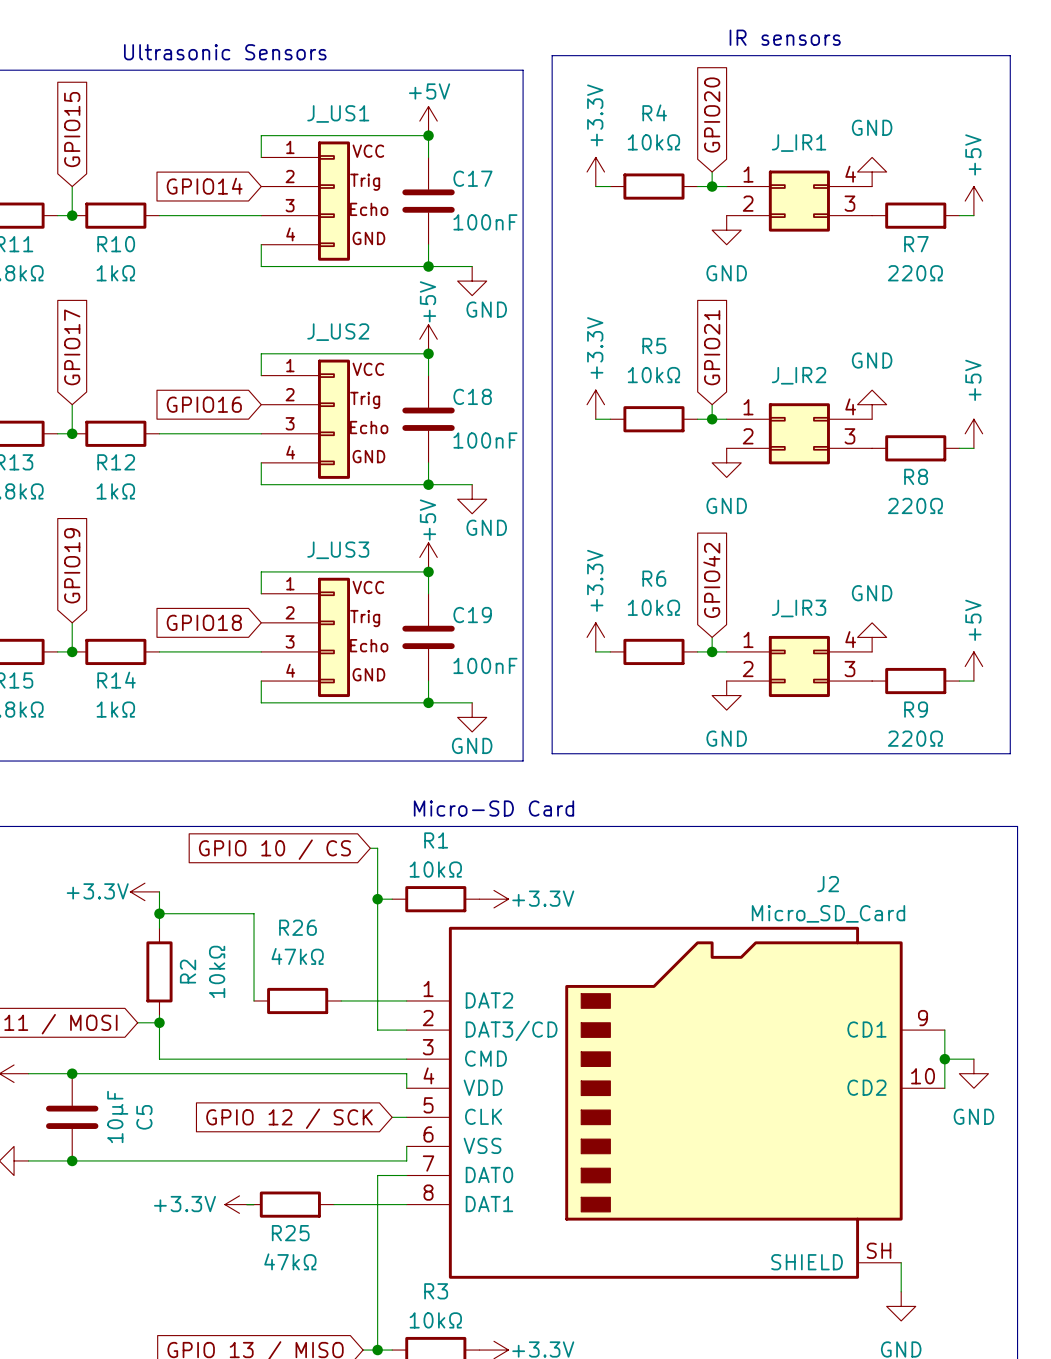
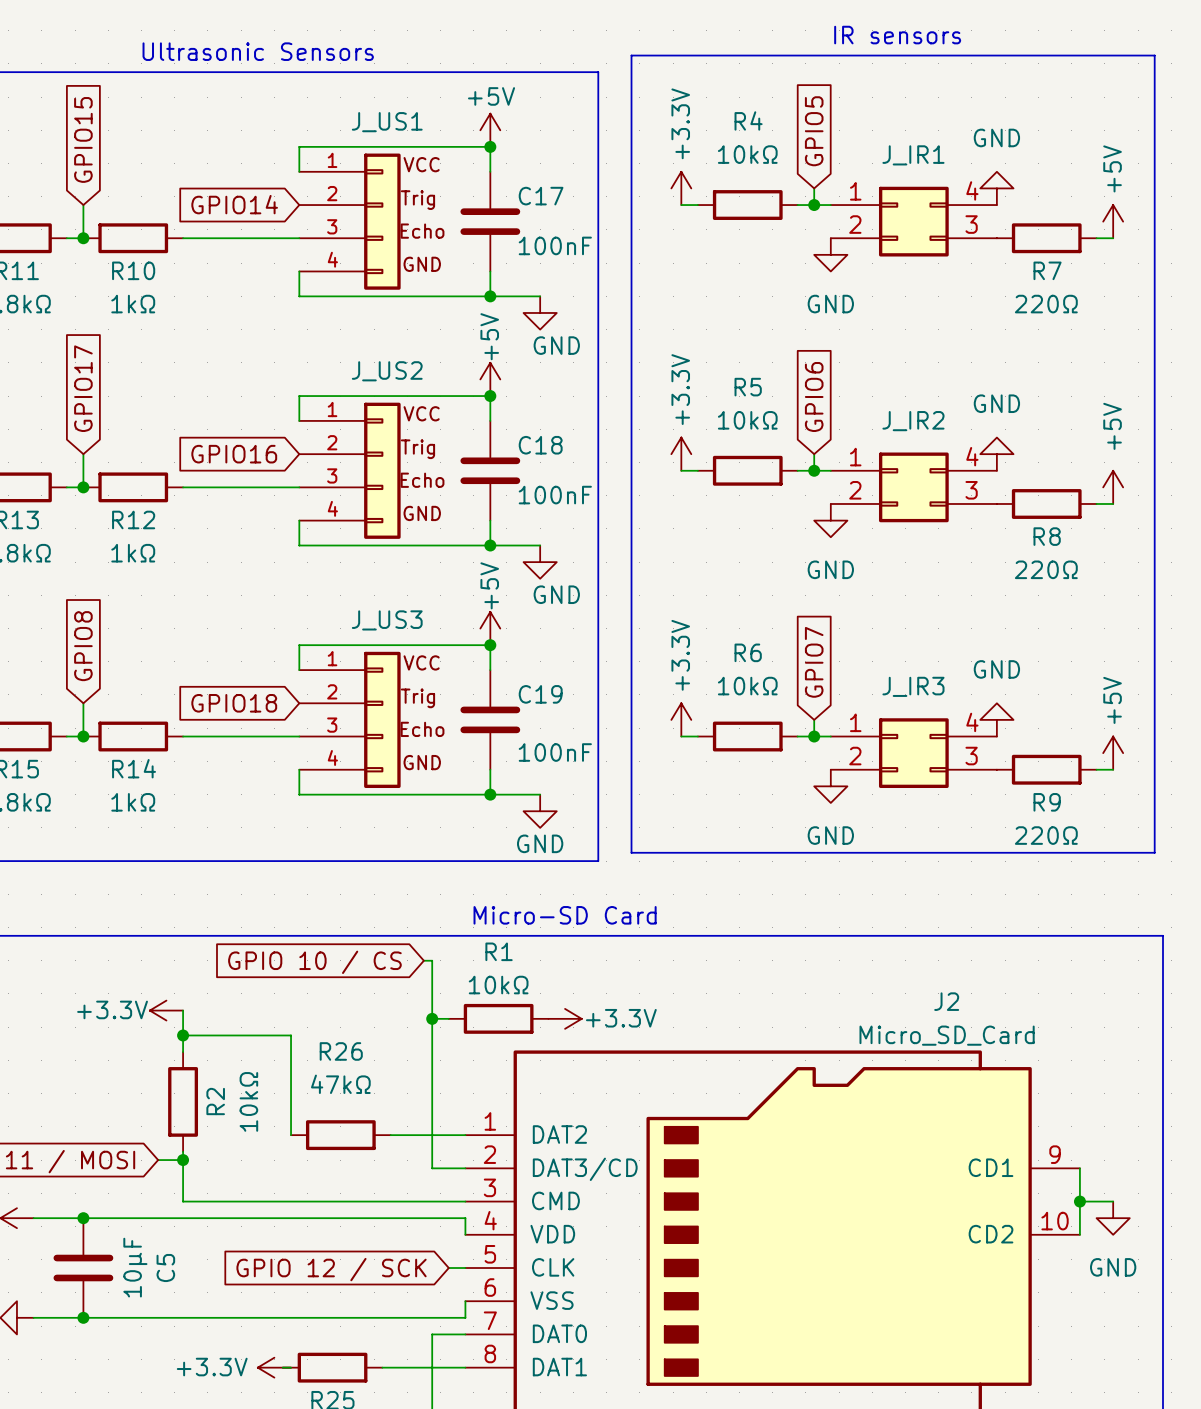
global label: GPIO20 (712, 115) -> GPIO5 (814, 131)
global label: GPIO21 (712, 347) -> GPIO6 (814, 396)
global label: GPIO19 (72, 565) -> GPIO8 (83, 646)
global label: GPIO42 (711, 580) -> GPIO7 (814, 662)

